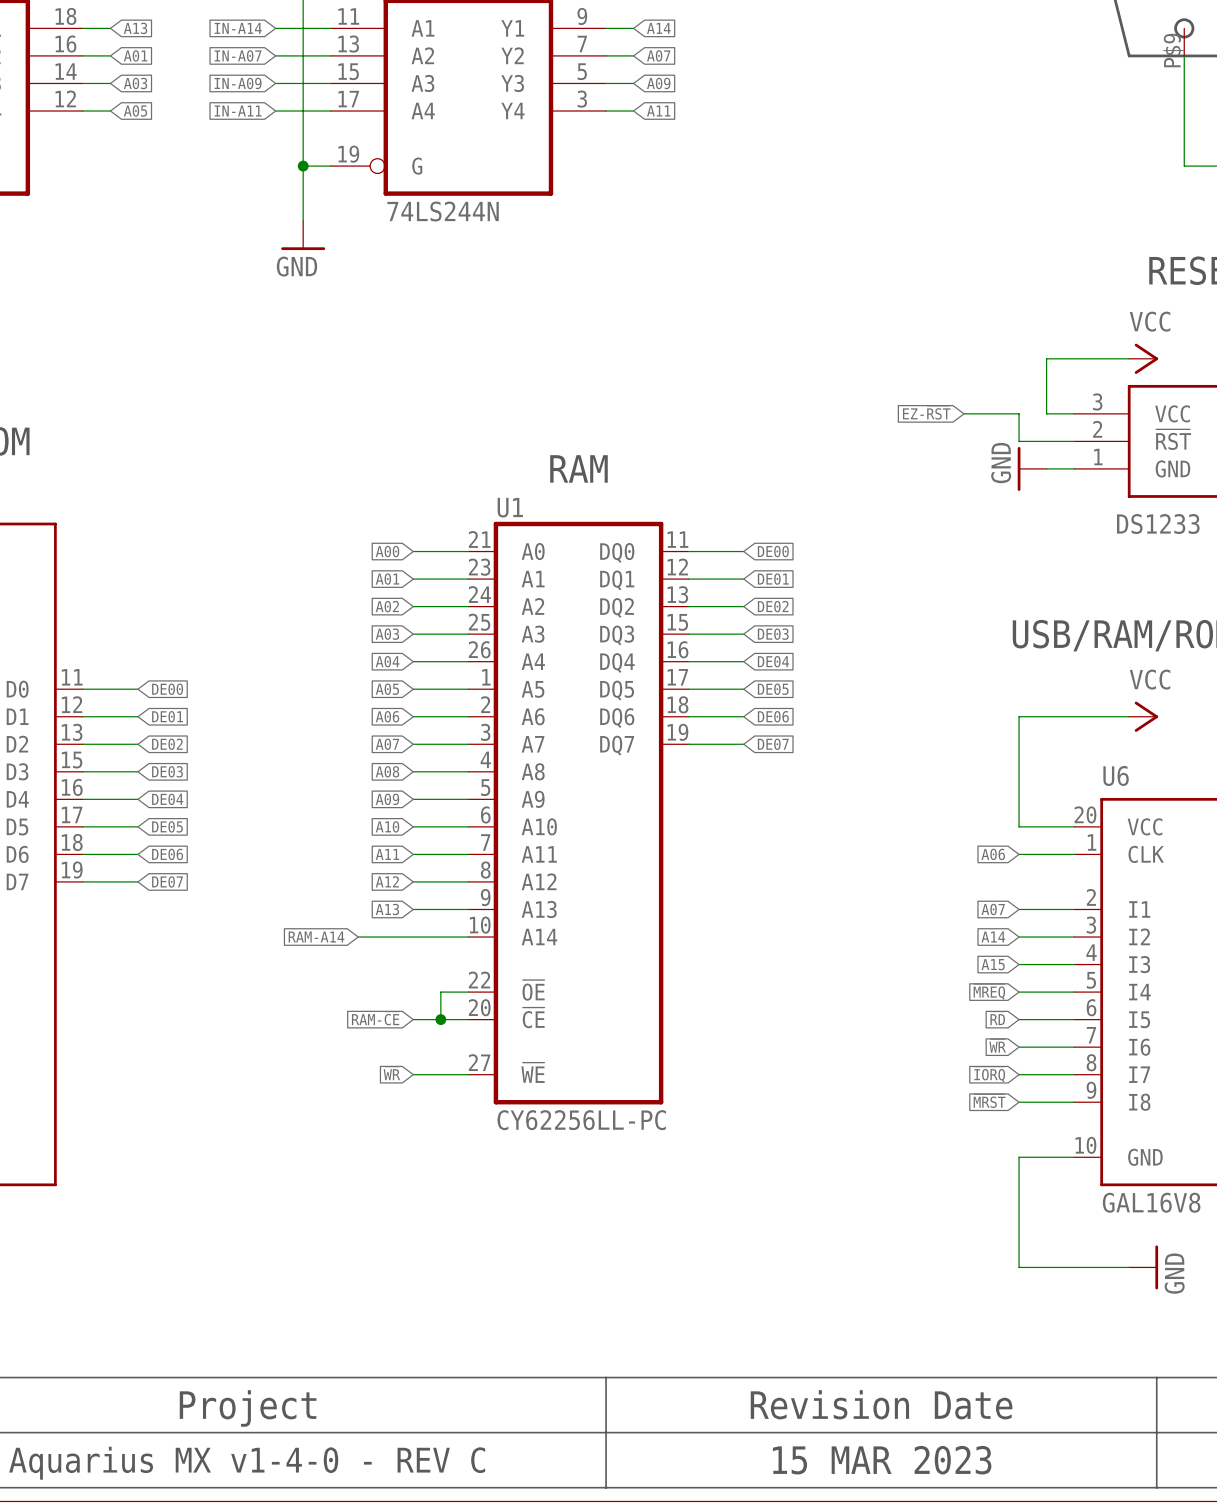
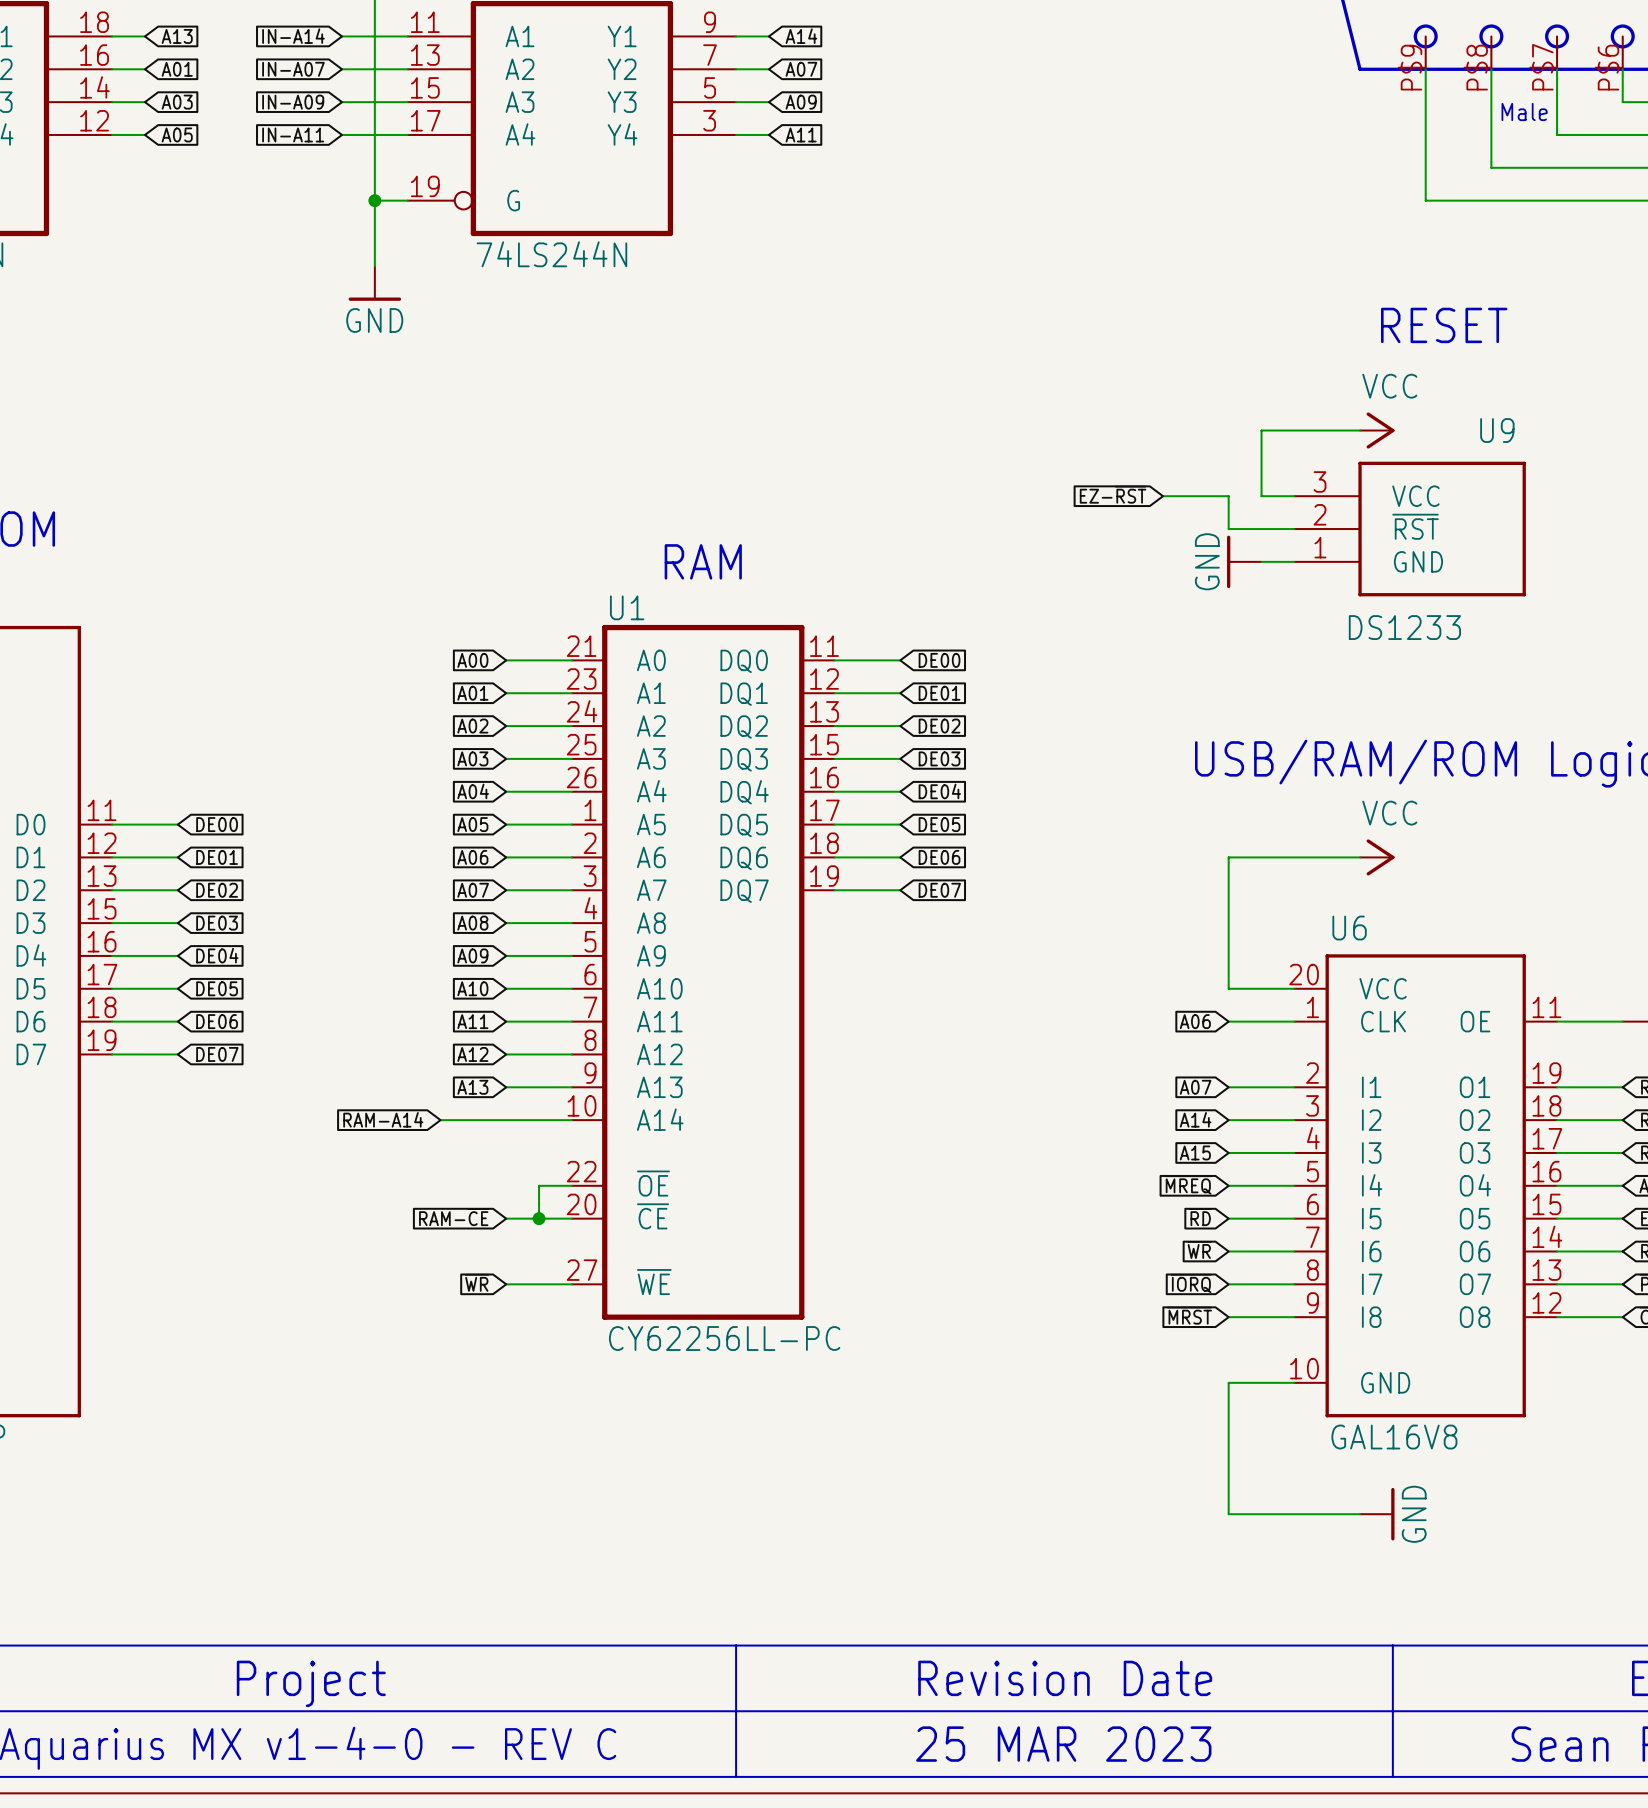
text: 15 MAR 2023 (882, 1460) -> 25 MAR 2023 (1063, 1744)

